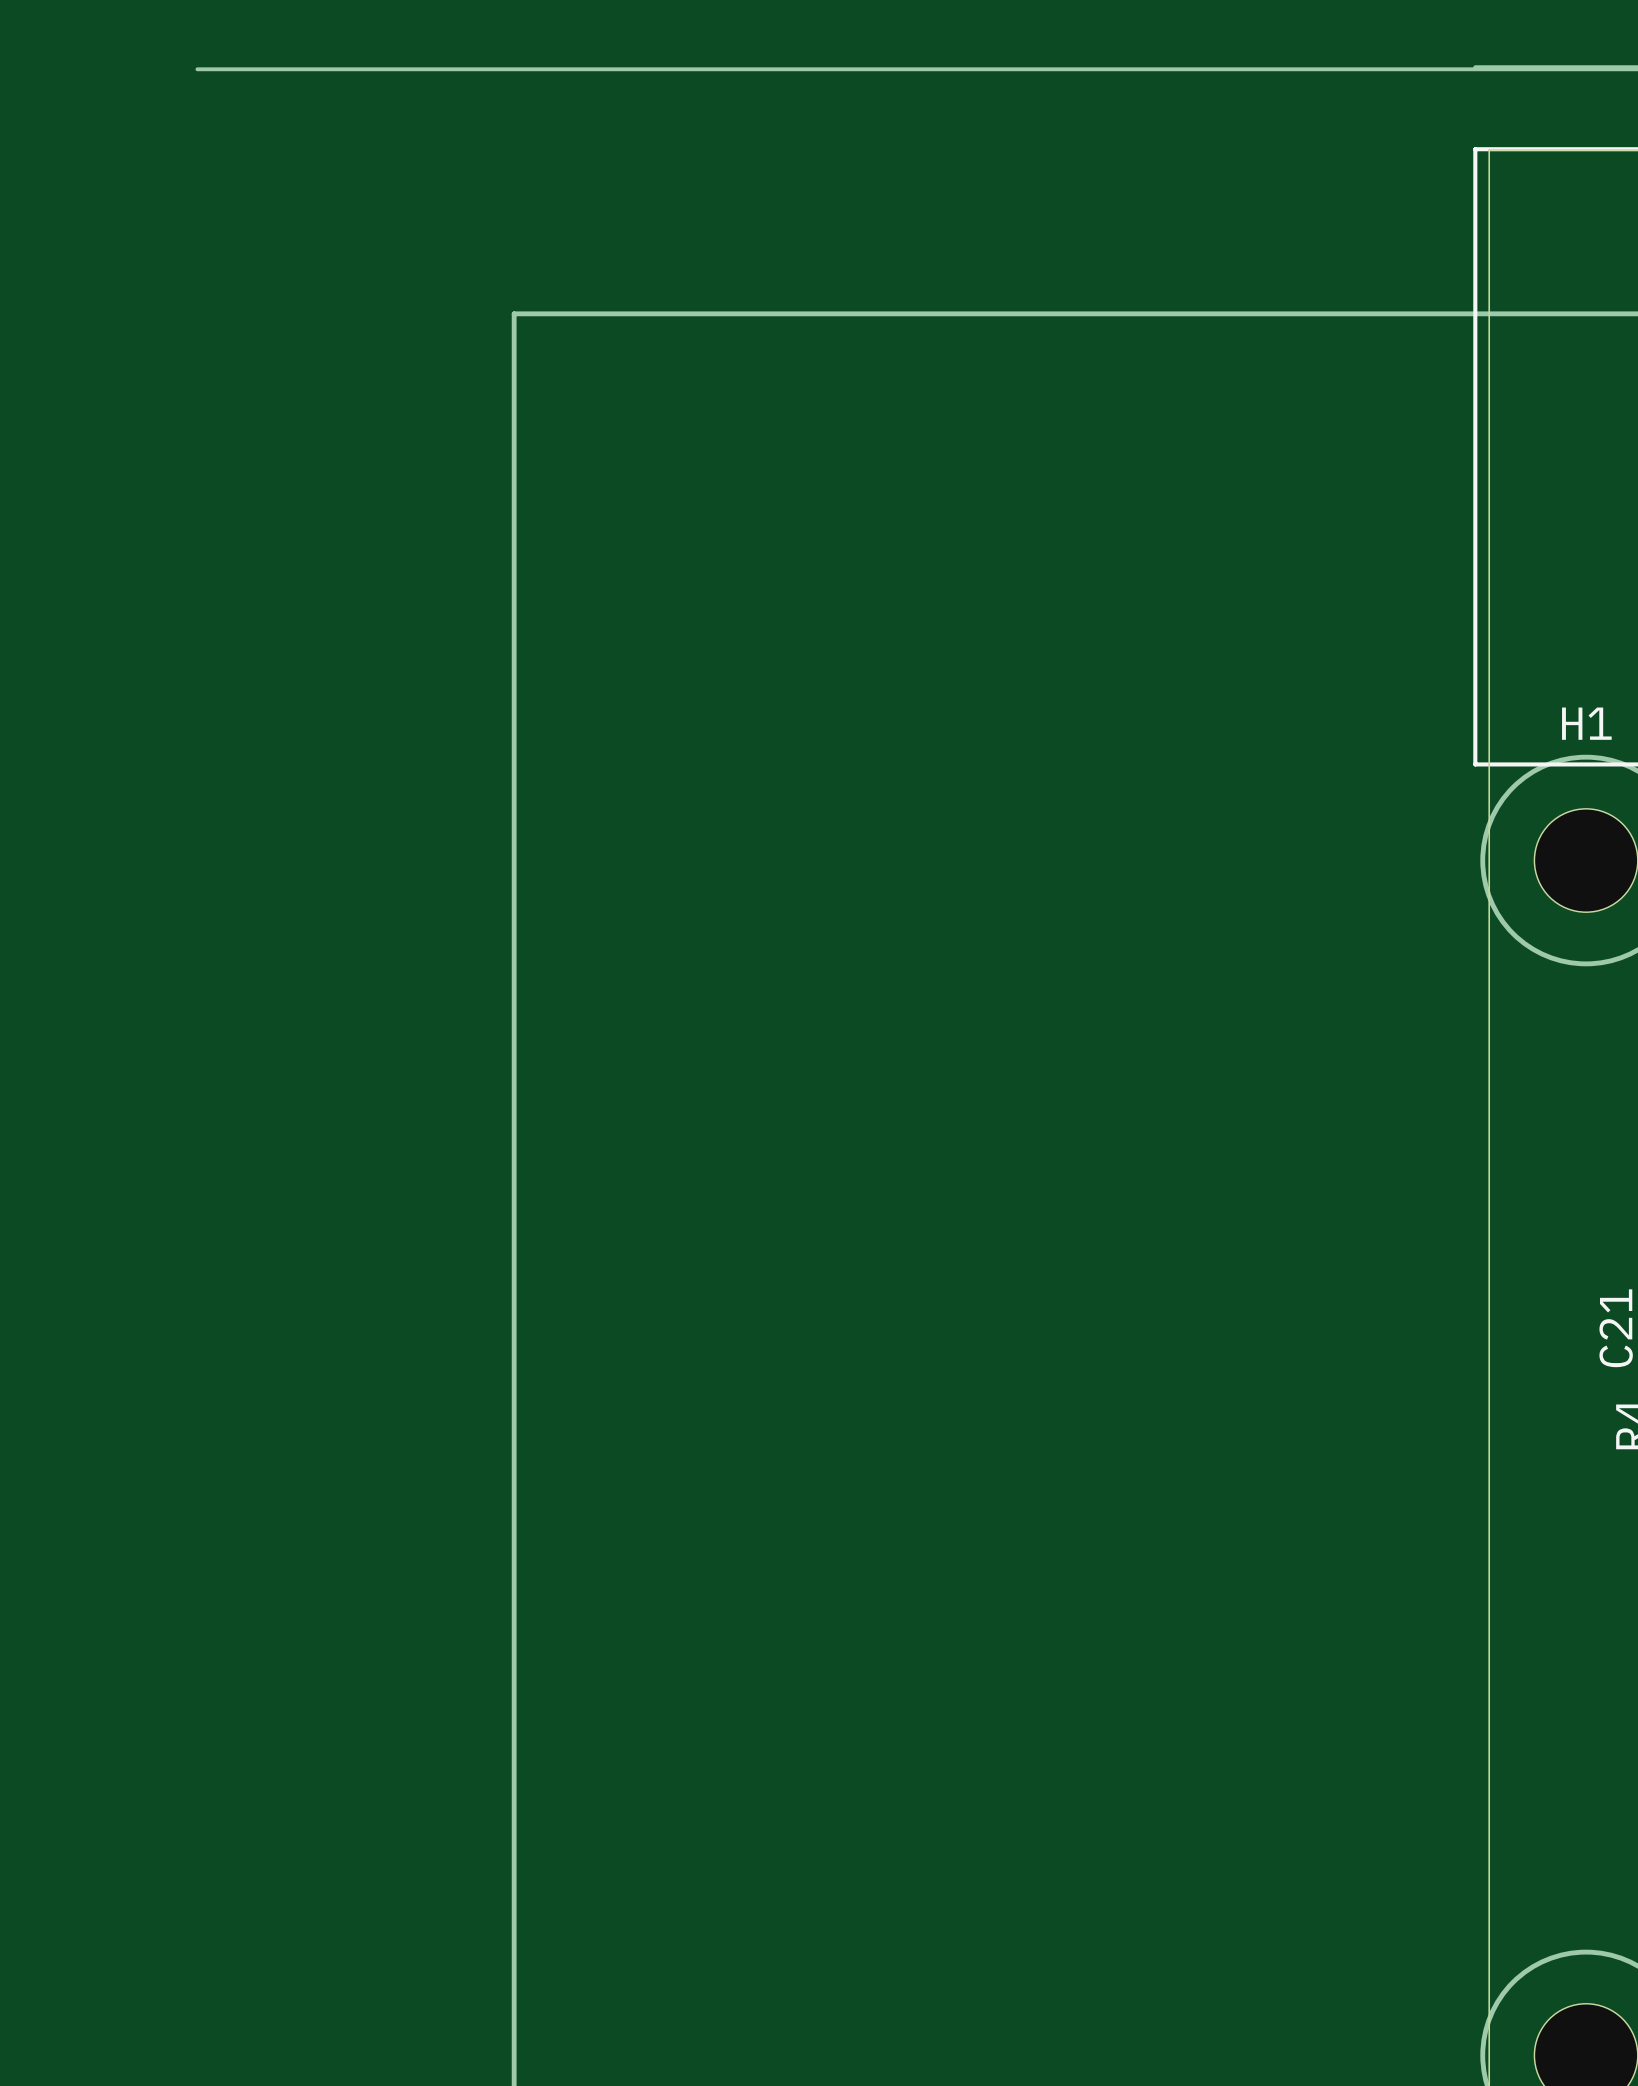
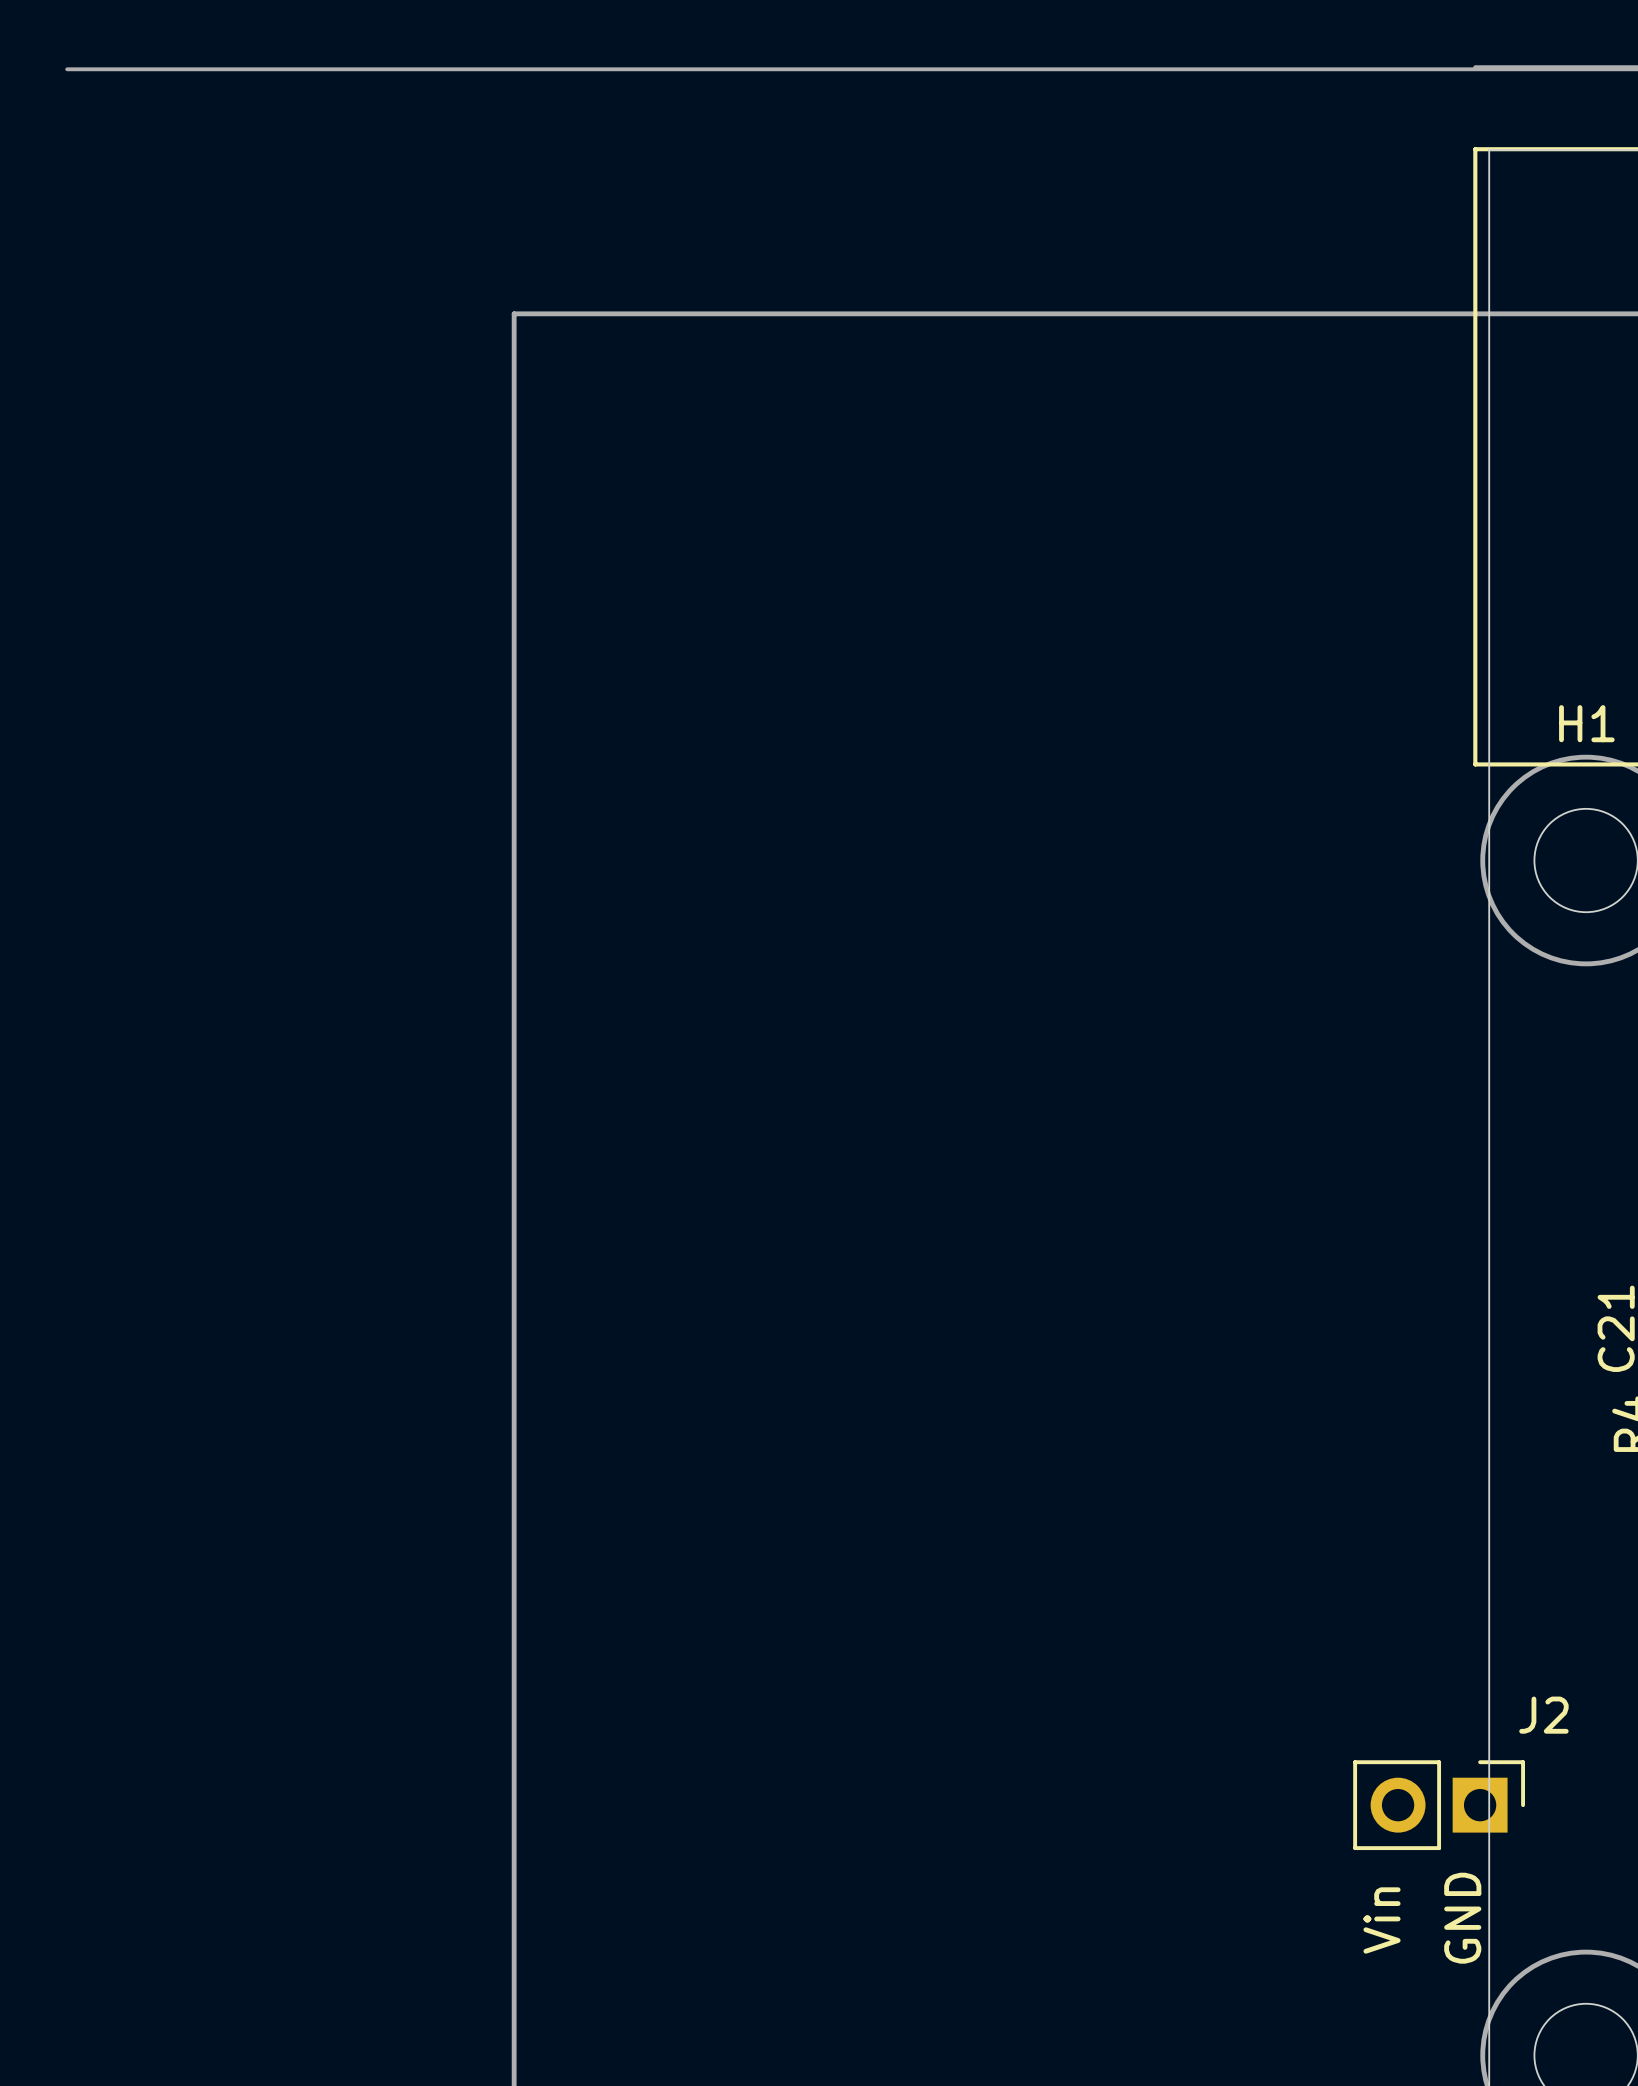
line: none -> (67, 69) (197, 69)
J2: none -> (1439, 1805)
text: none -> GND (1462, 1918)
text: none -> Vin (1382, 1920)

